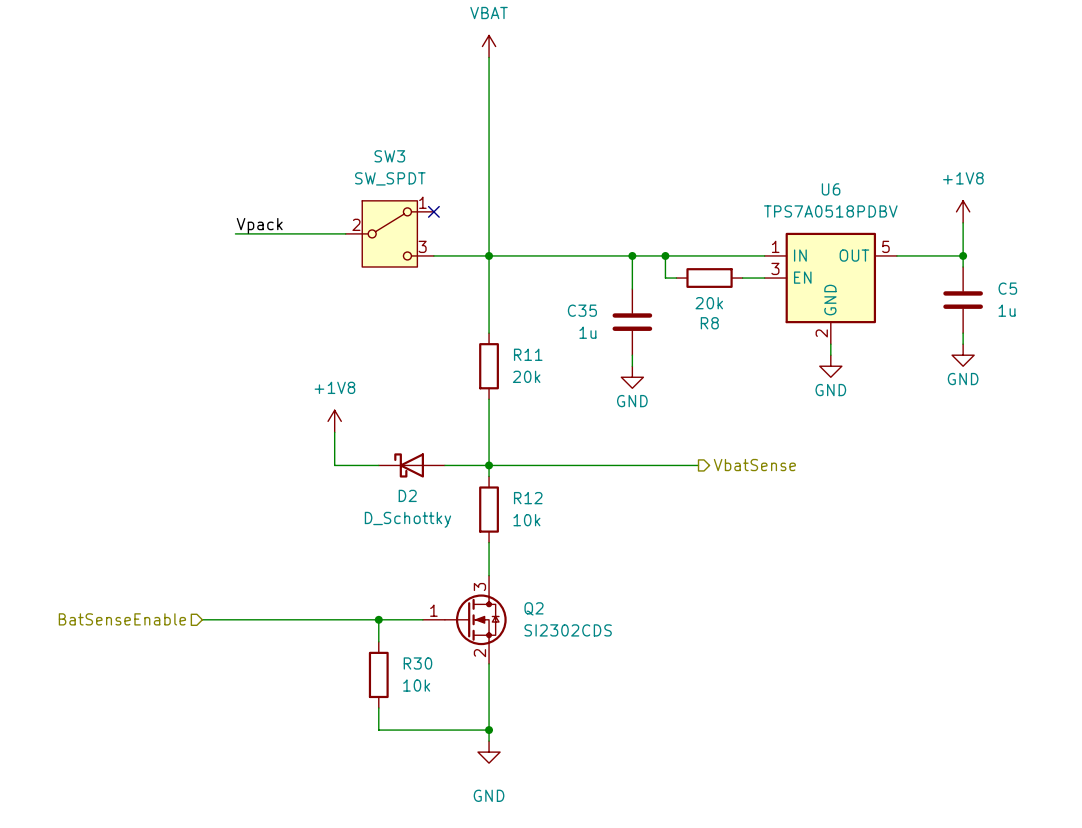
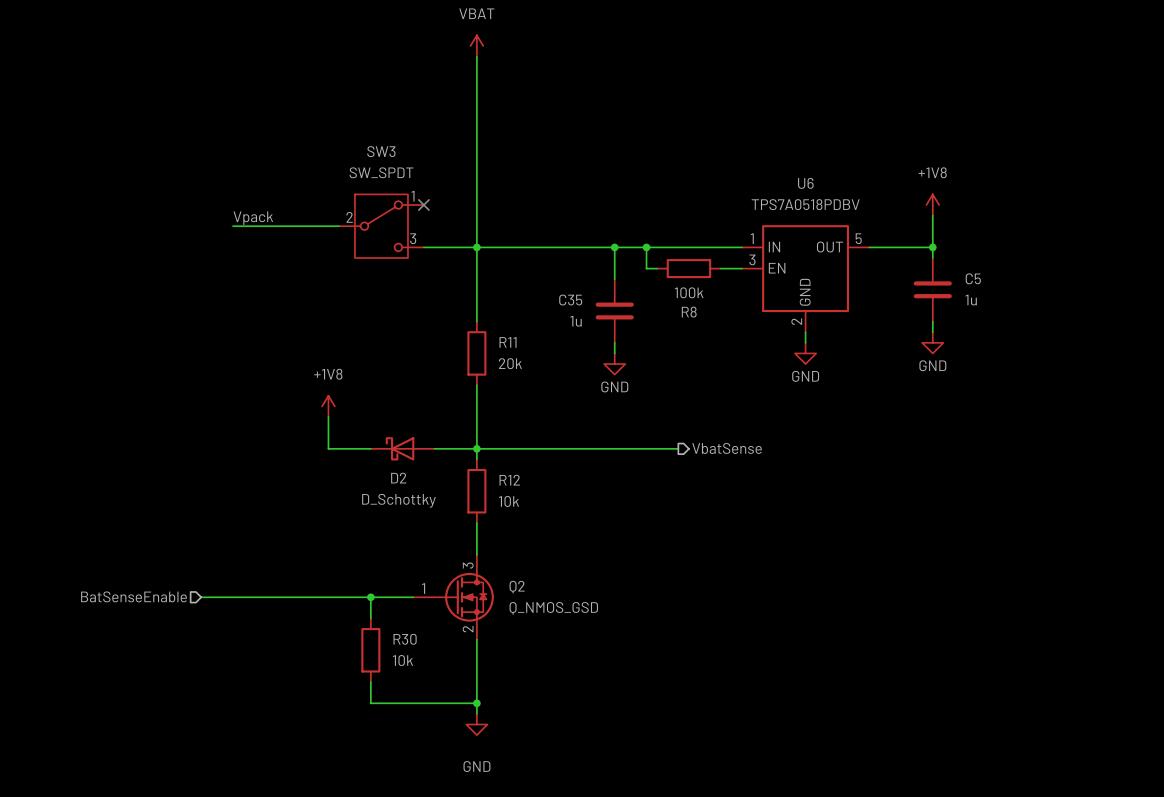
R8 value: 20k (709, 303) -> 100k (689, 292)
Q2 value: SI2302CDS (568, 630) -> Q_NMOS_GSD (553, 608)

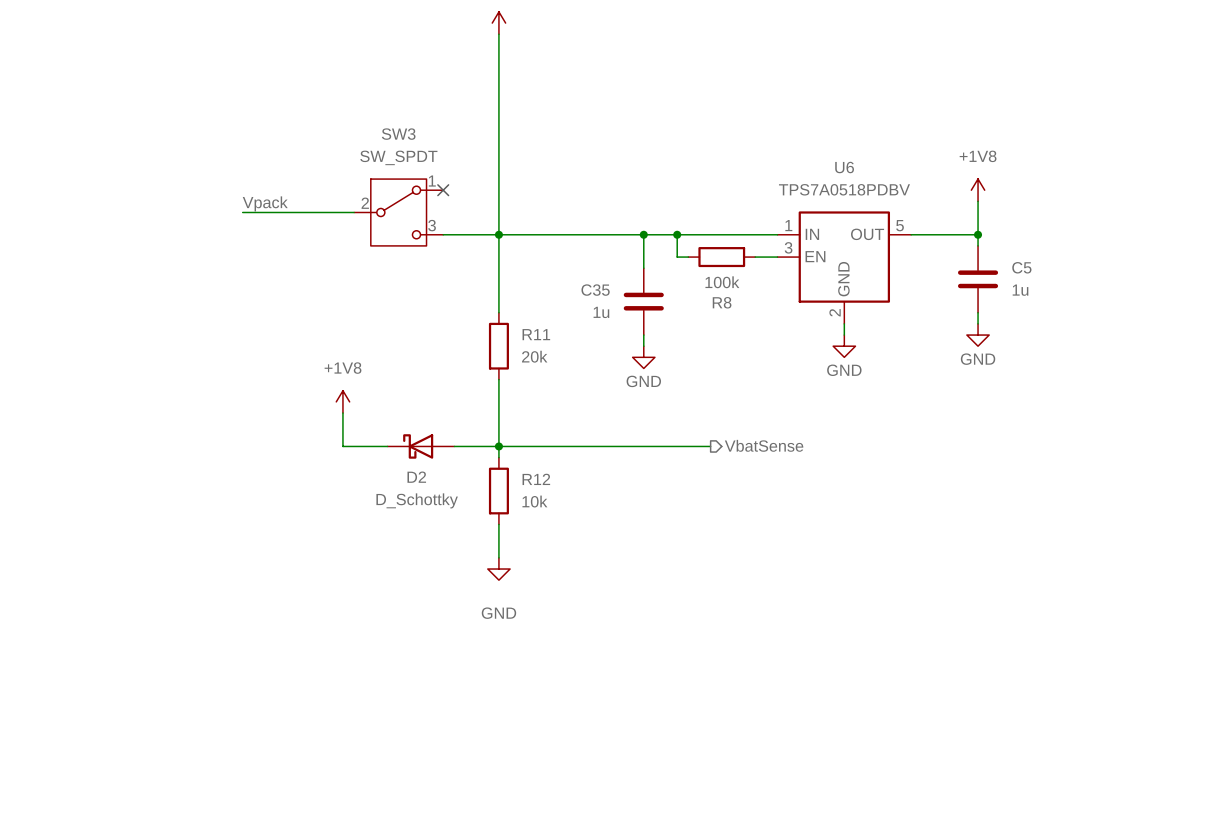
hierarchical label: BatSenseEnable (133, 596) -> none
wire: (201, 597) (413, 597) -> none
wire: (370, 597) (370, 618) -> none
junction: (370, 597) -> none
Q2: Q_NMOS_GSD (453, 597) -> none
wire: (476, 639) (476, 713) -> none
R30: 10k (370, 650) -> none
wire: (370, 682) (370, 703) (476, 703) -> none
junction: (476, 703) -> none
power symbol position: GND (476, 724) -> GND (498, 569)

